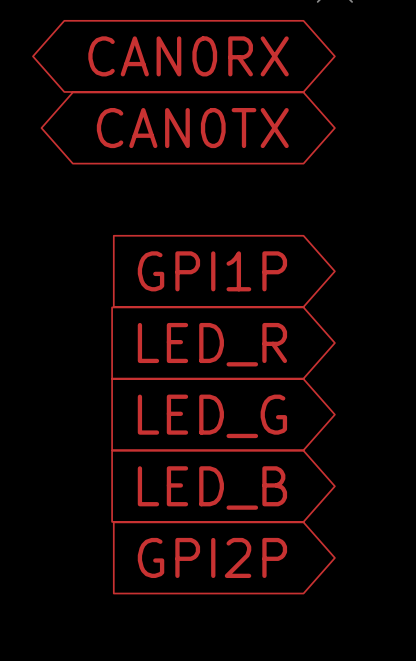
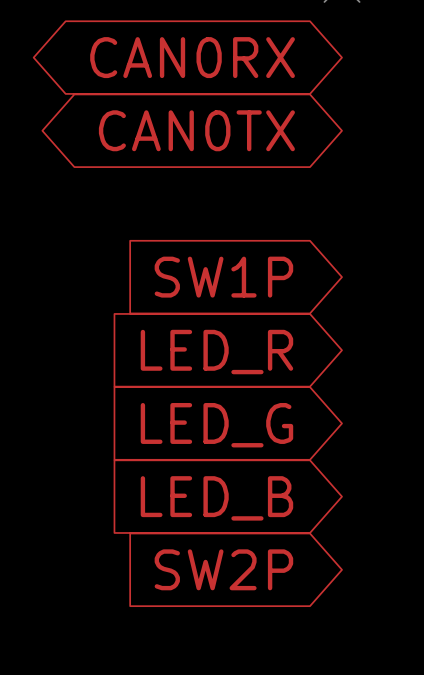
global label: GPI1P (212, 271) -> SW1P (223, 277)
global label: GPI2P (212, 557) -> SW2P (223, 569)

